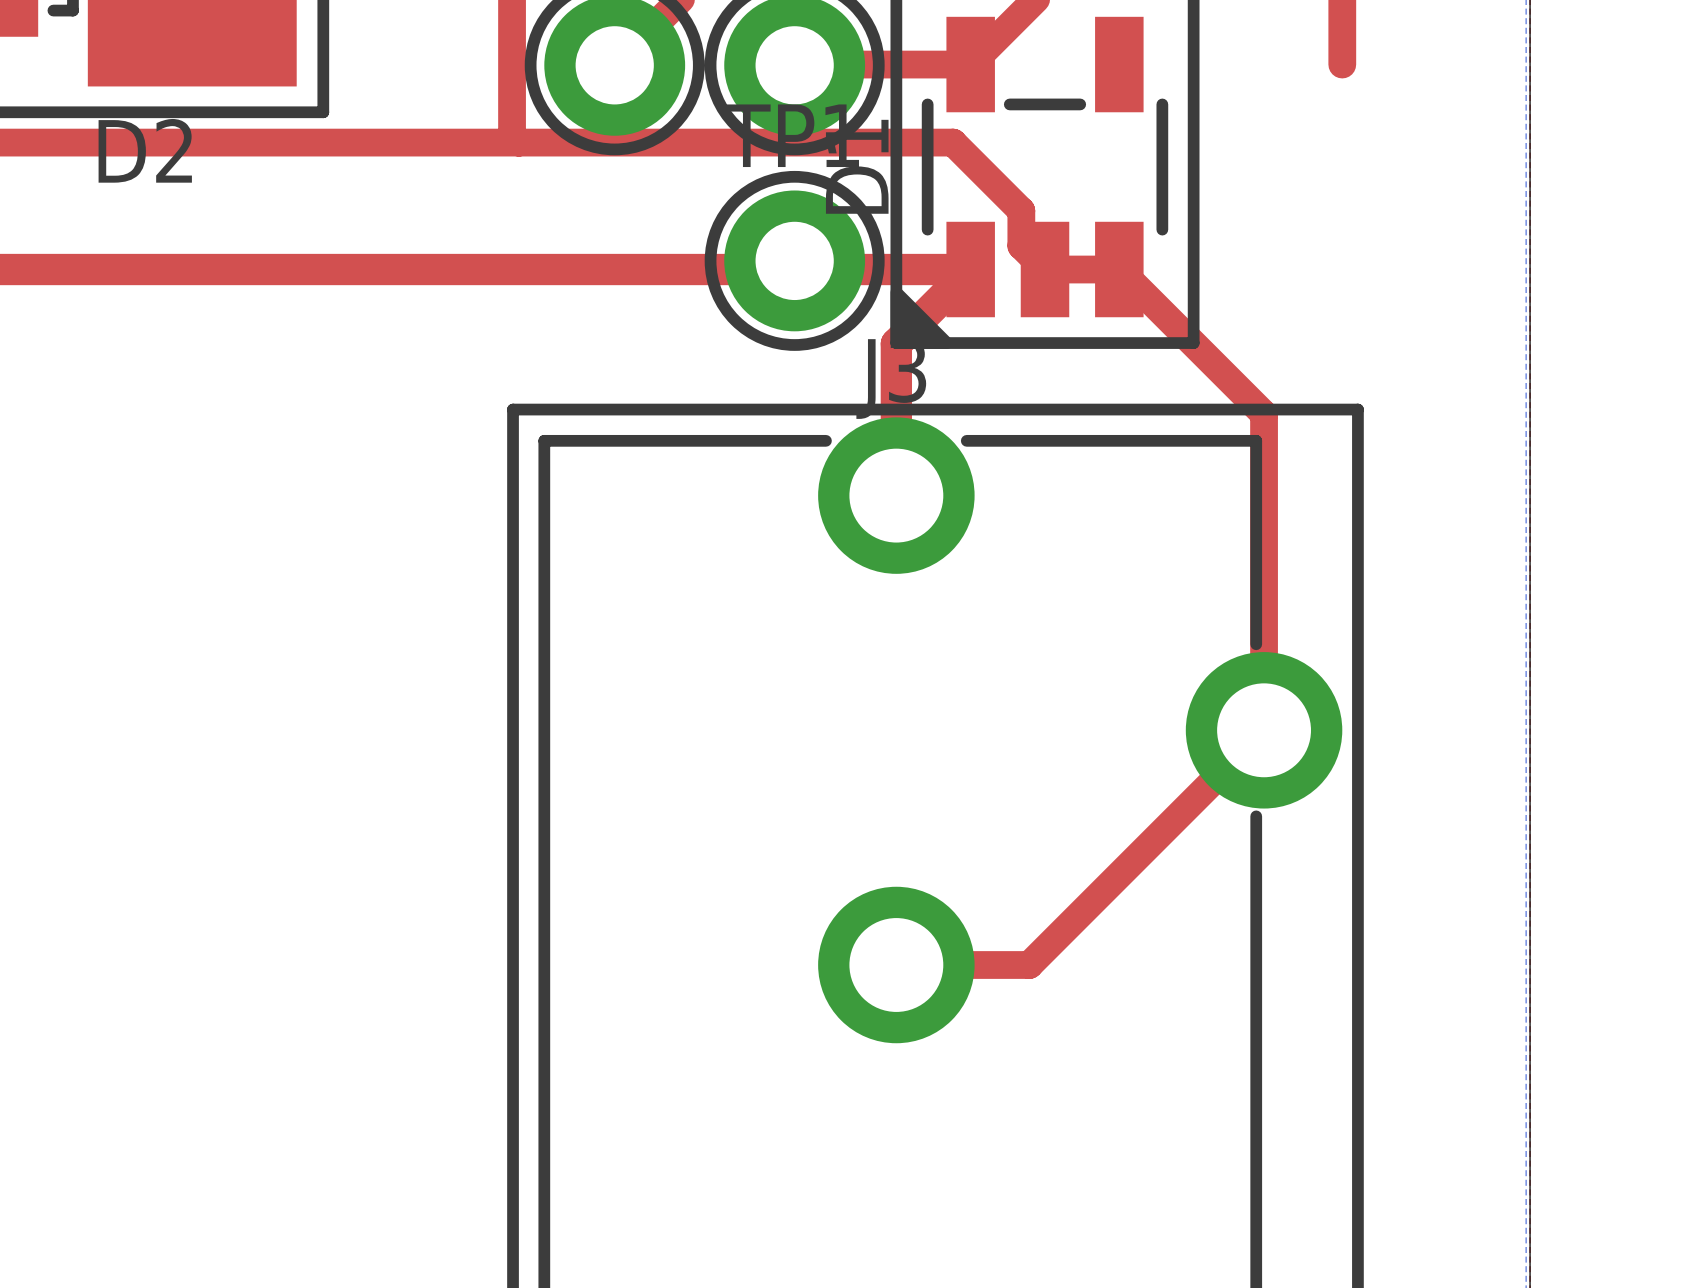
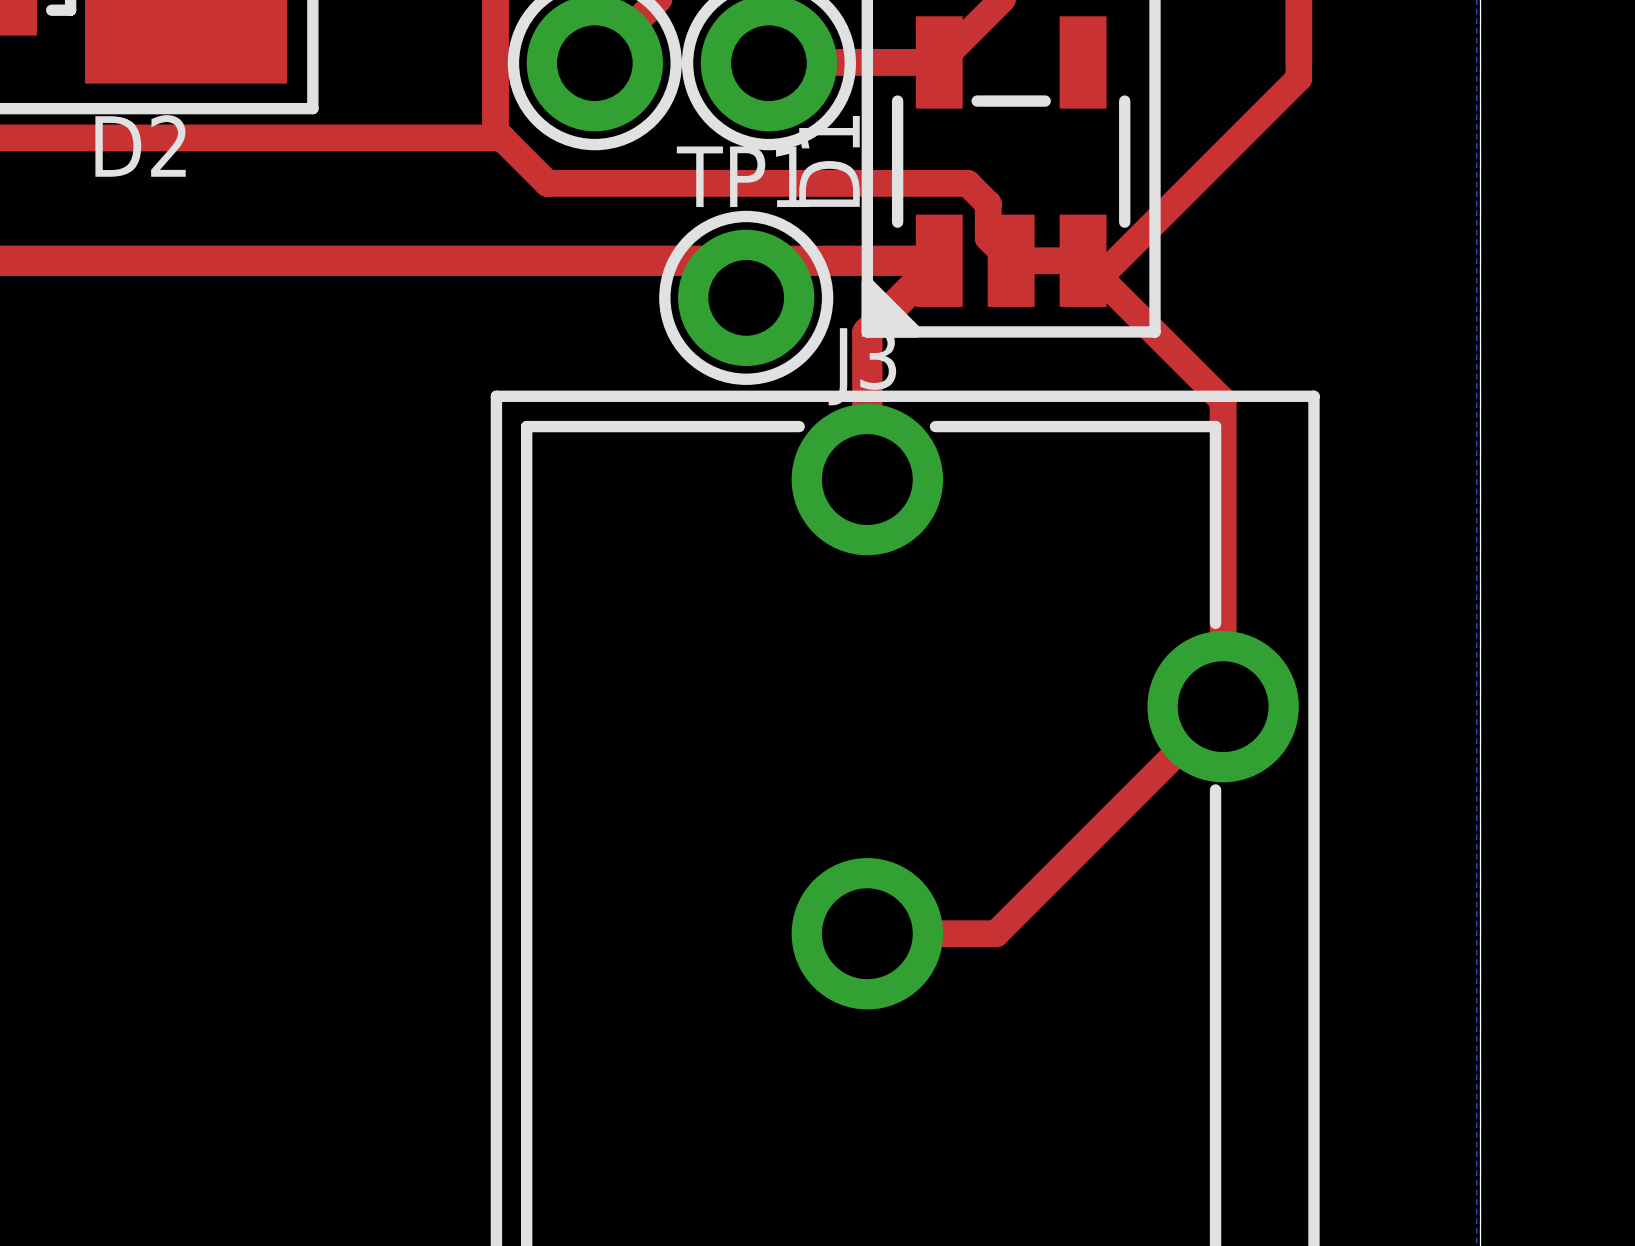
top track: none -> (1298, 62) (1298, 78) (1099, 277)
top track: (518, 142) (953, 142) (1000, 189) -> (502, 137) (547, 183) (967, 183)
TP1 position: (794, 260) -> (746, 297)

